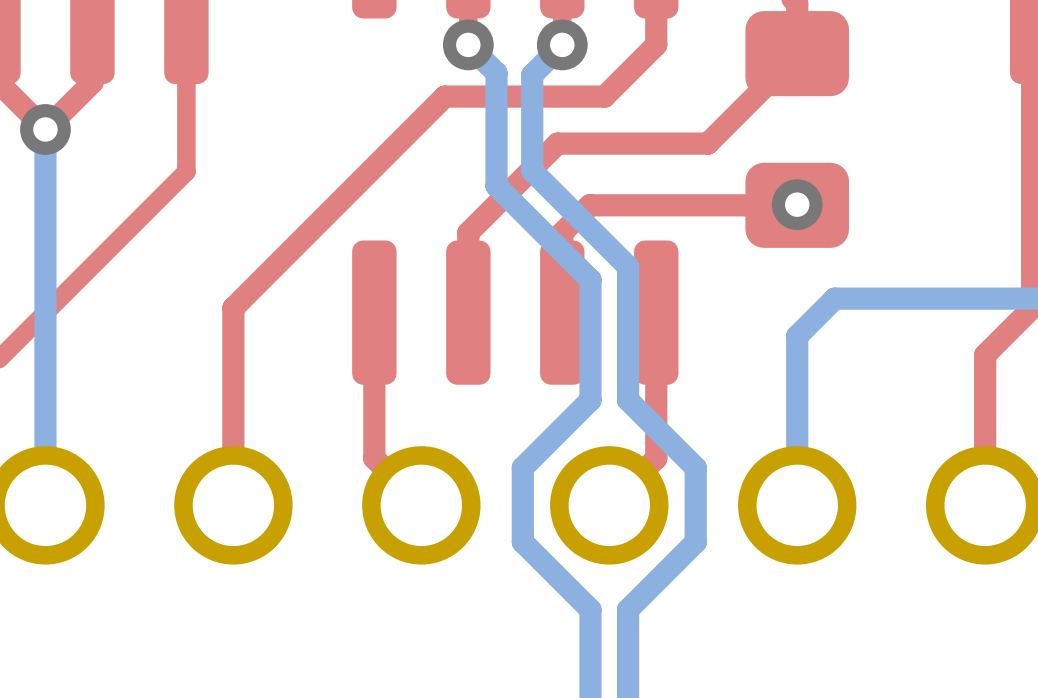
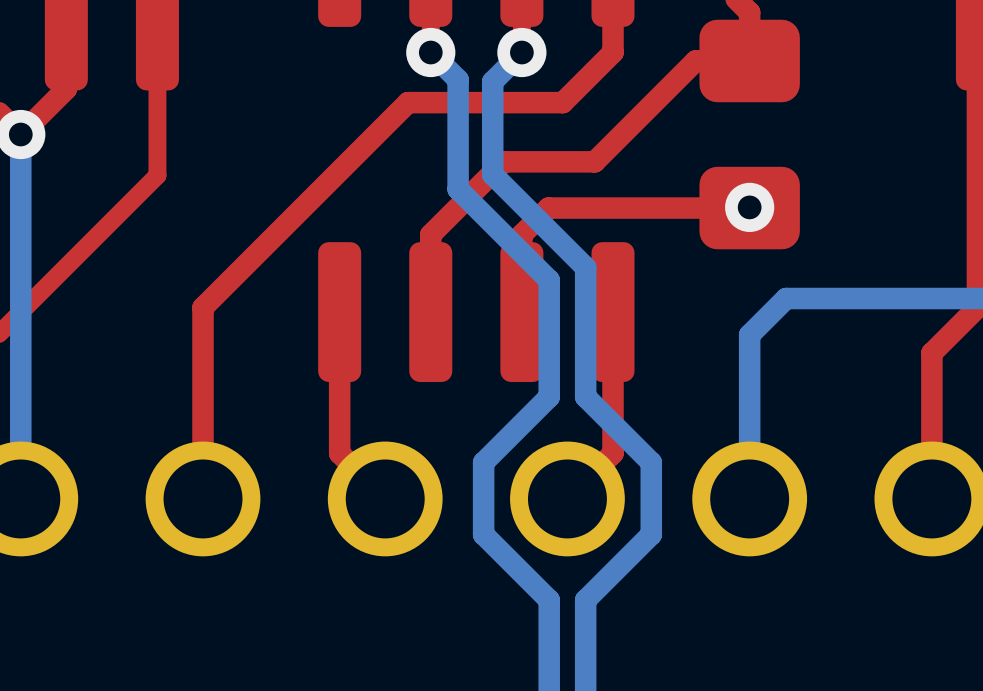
top track: (797, 54) (707, 143) (557, 143) (543, 157) -> (749, 60) (695, 60) (594, 161) (503, 161)

